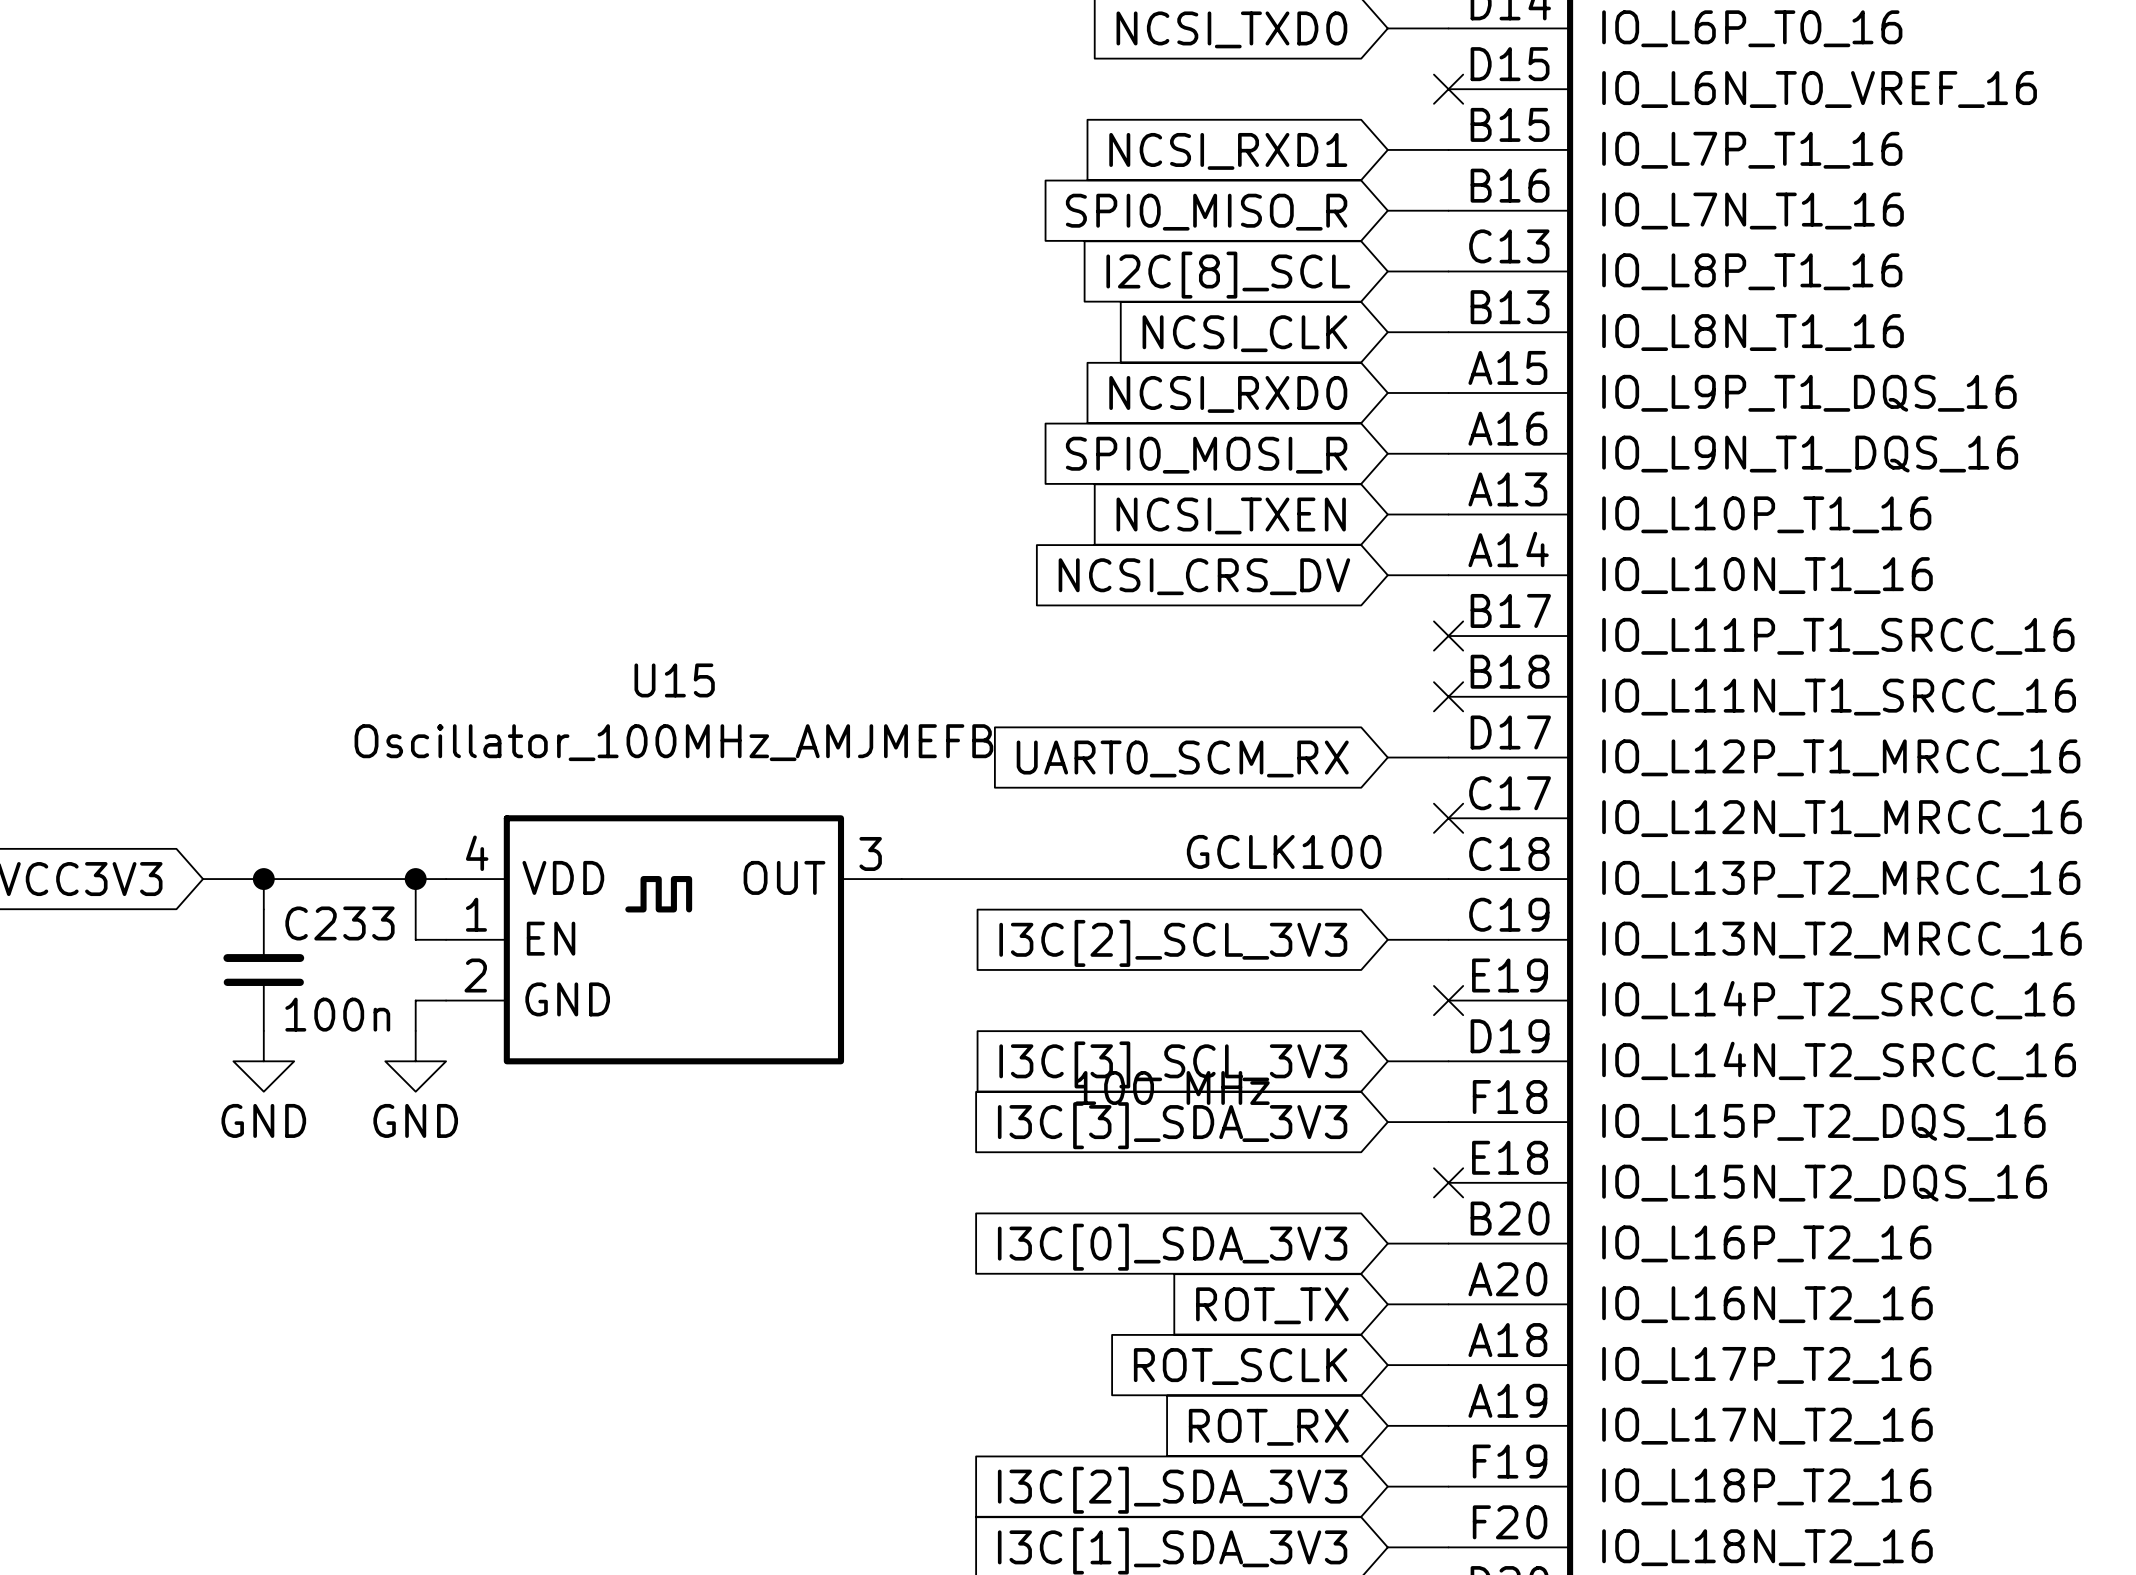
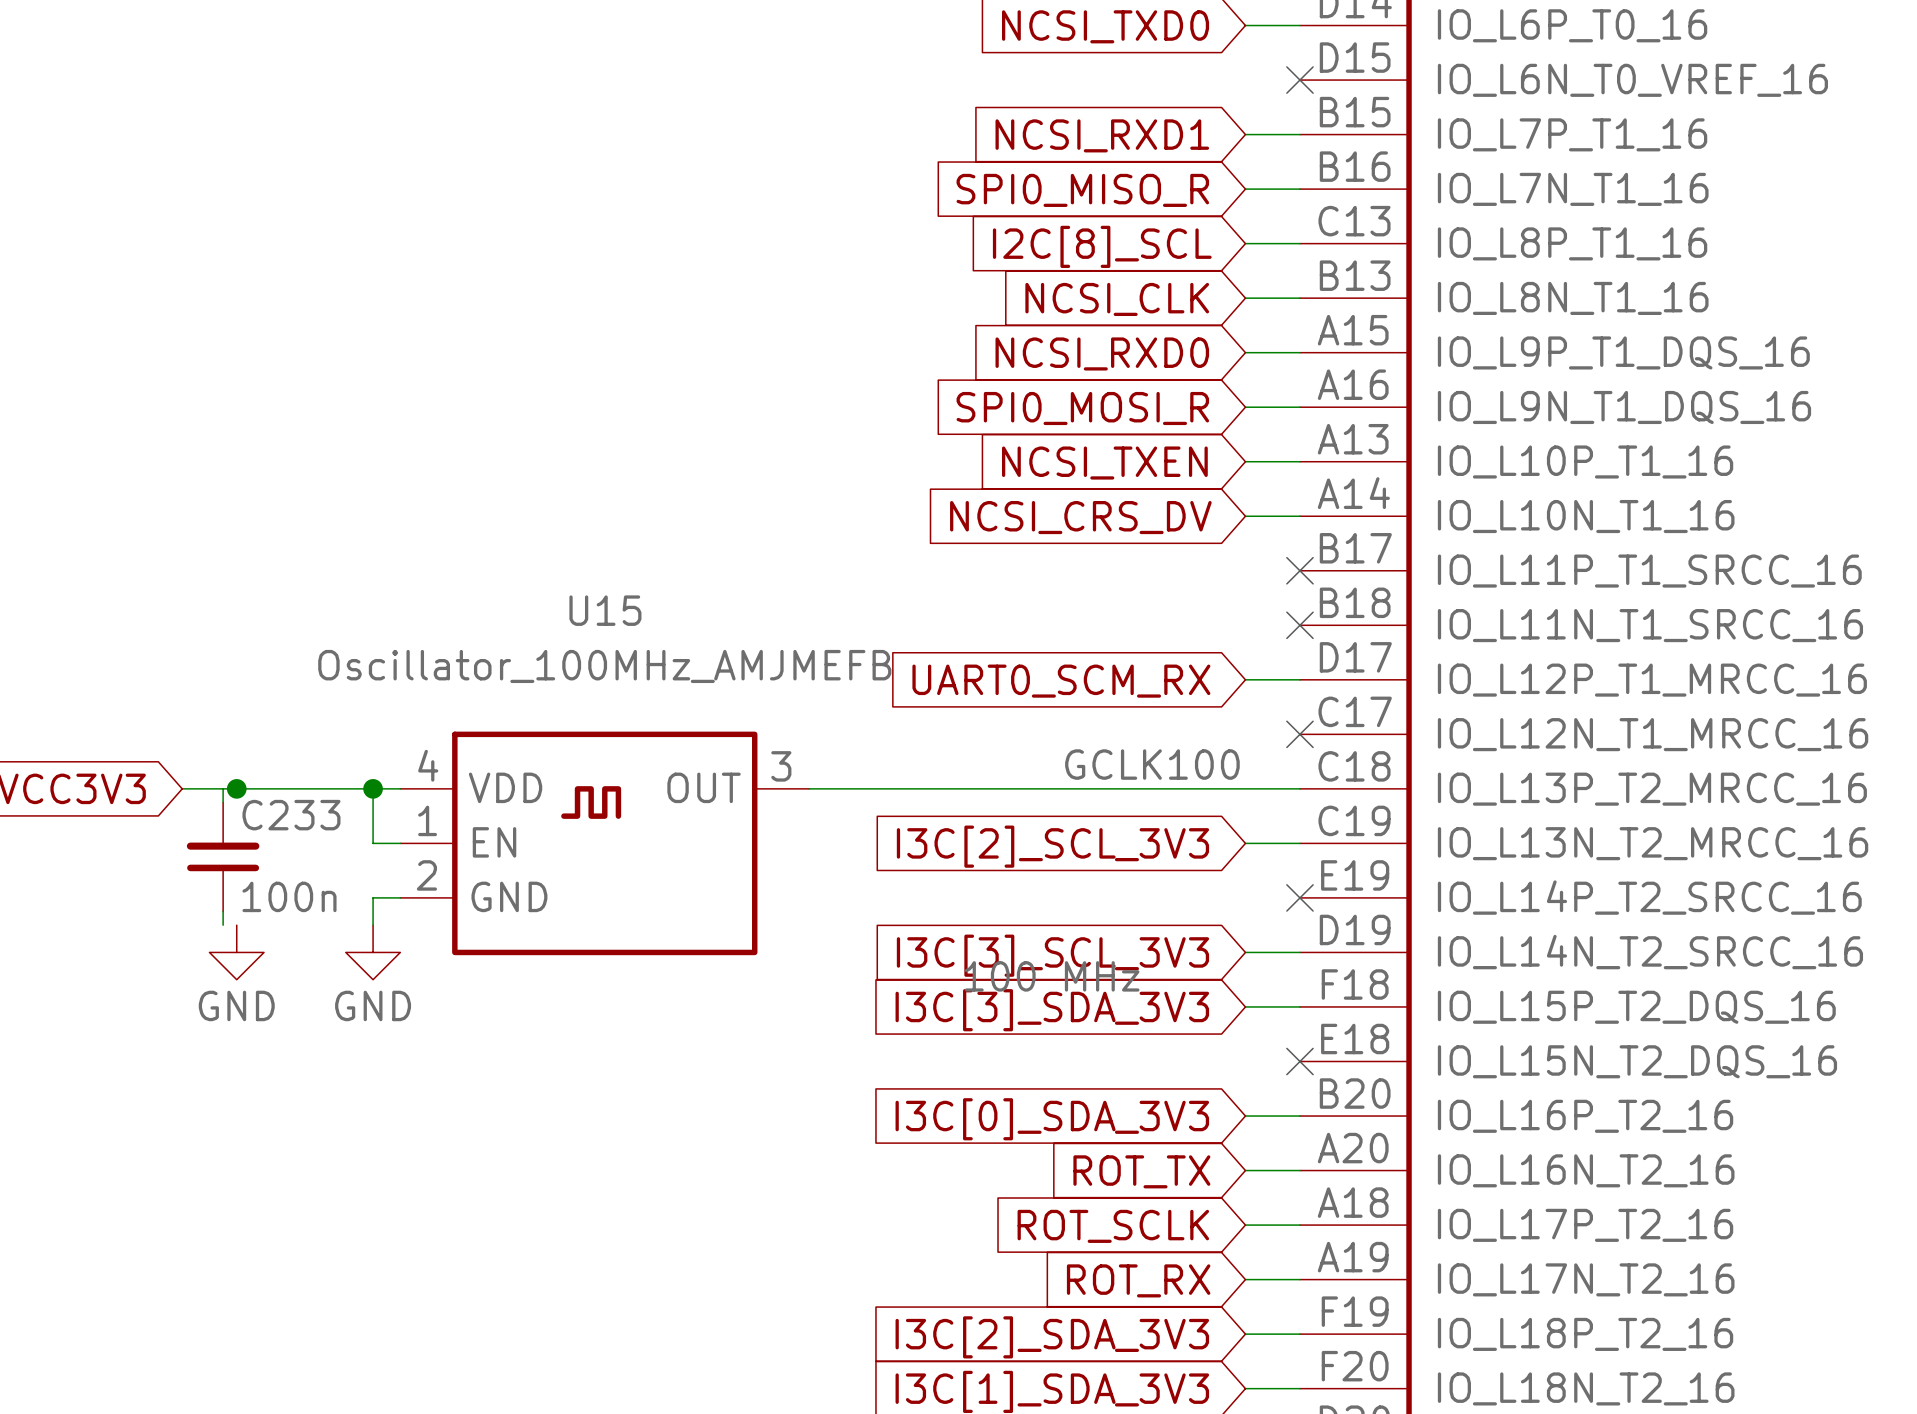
wire: none -> (223, 788) (223, 802)
wire: (263, 879) (263, 909) -> none
C233 position: (263, 970) -> (223, 857)
wire: none -> (223, 911) (223, 925)

